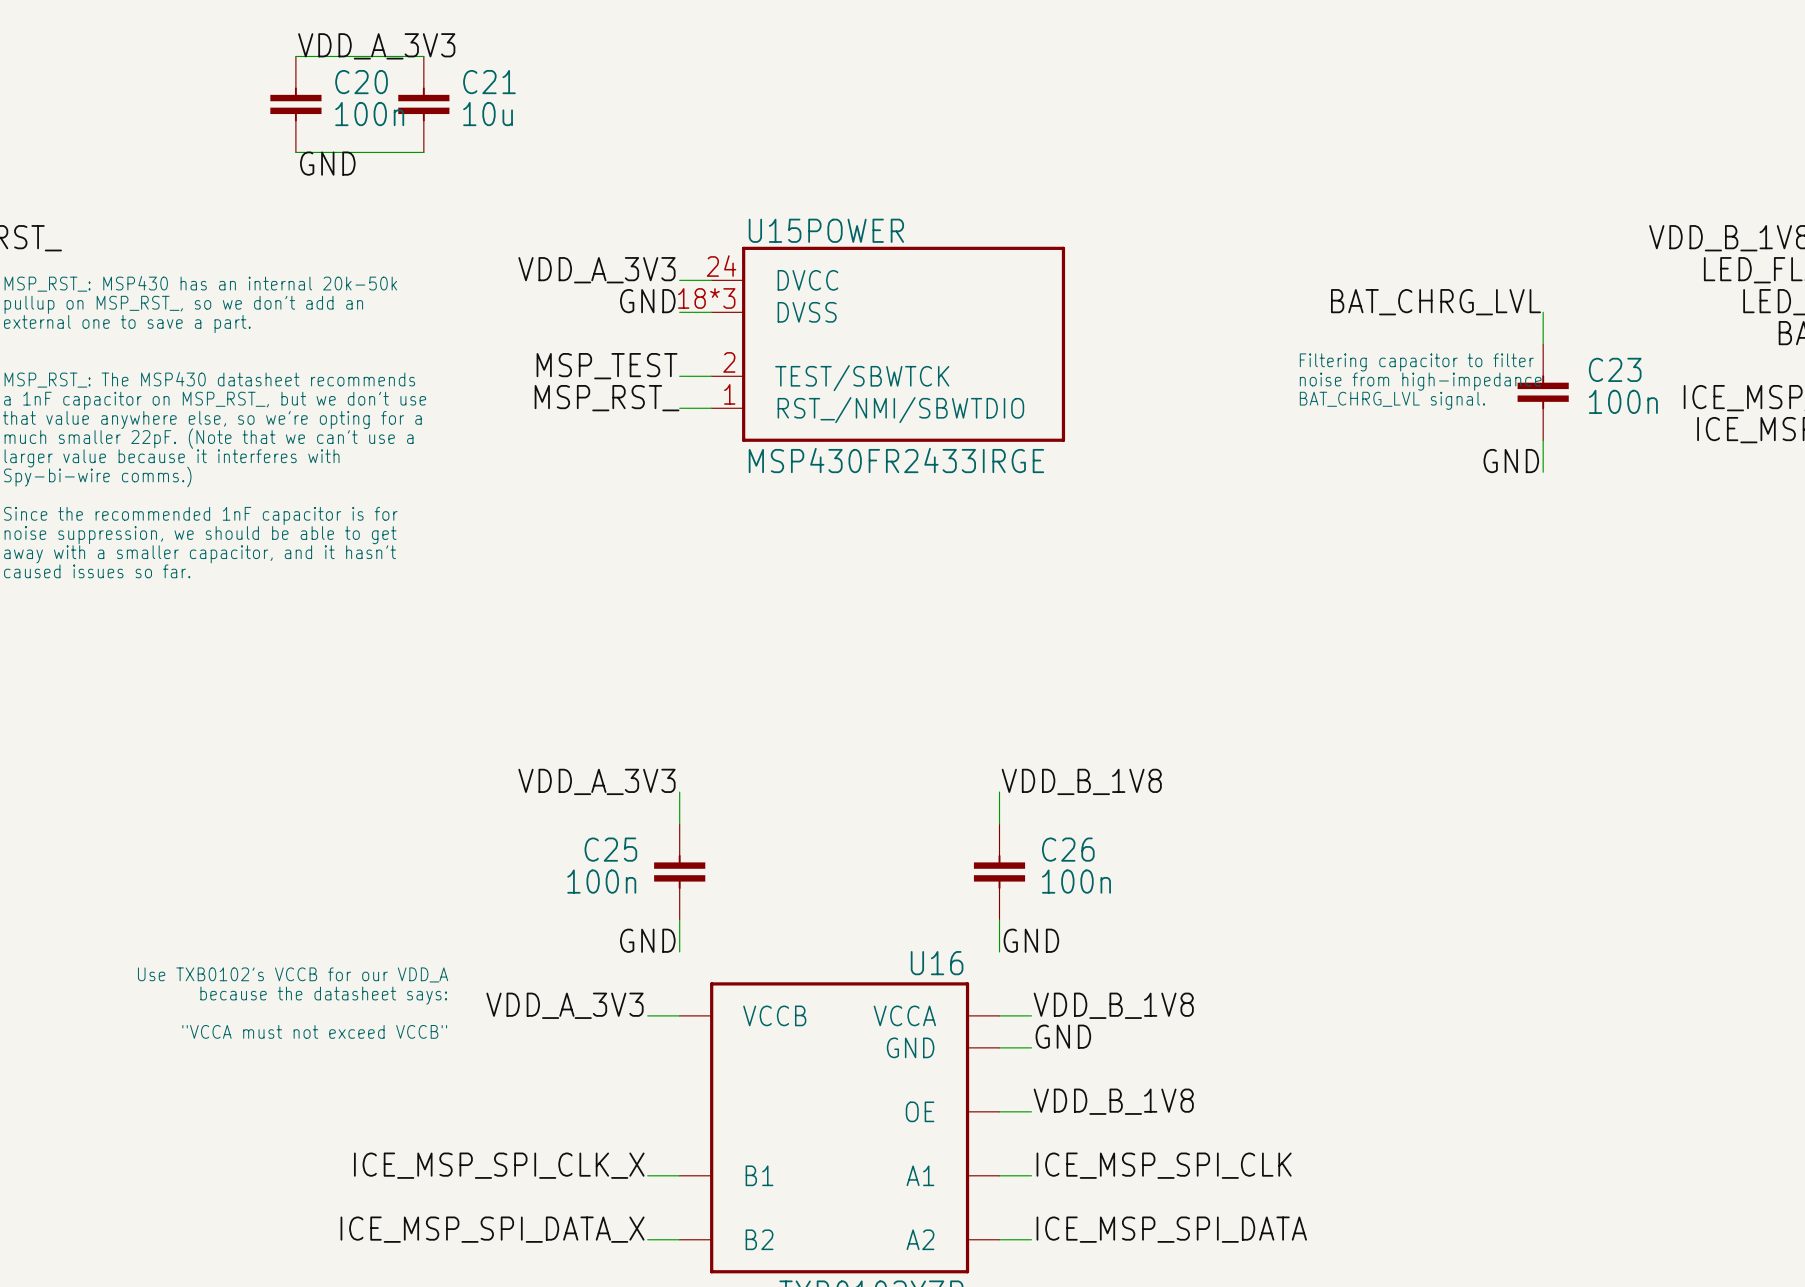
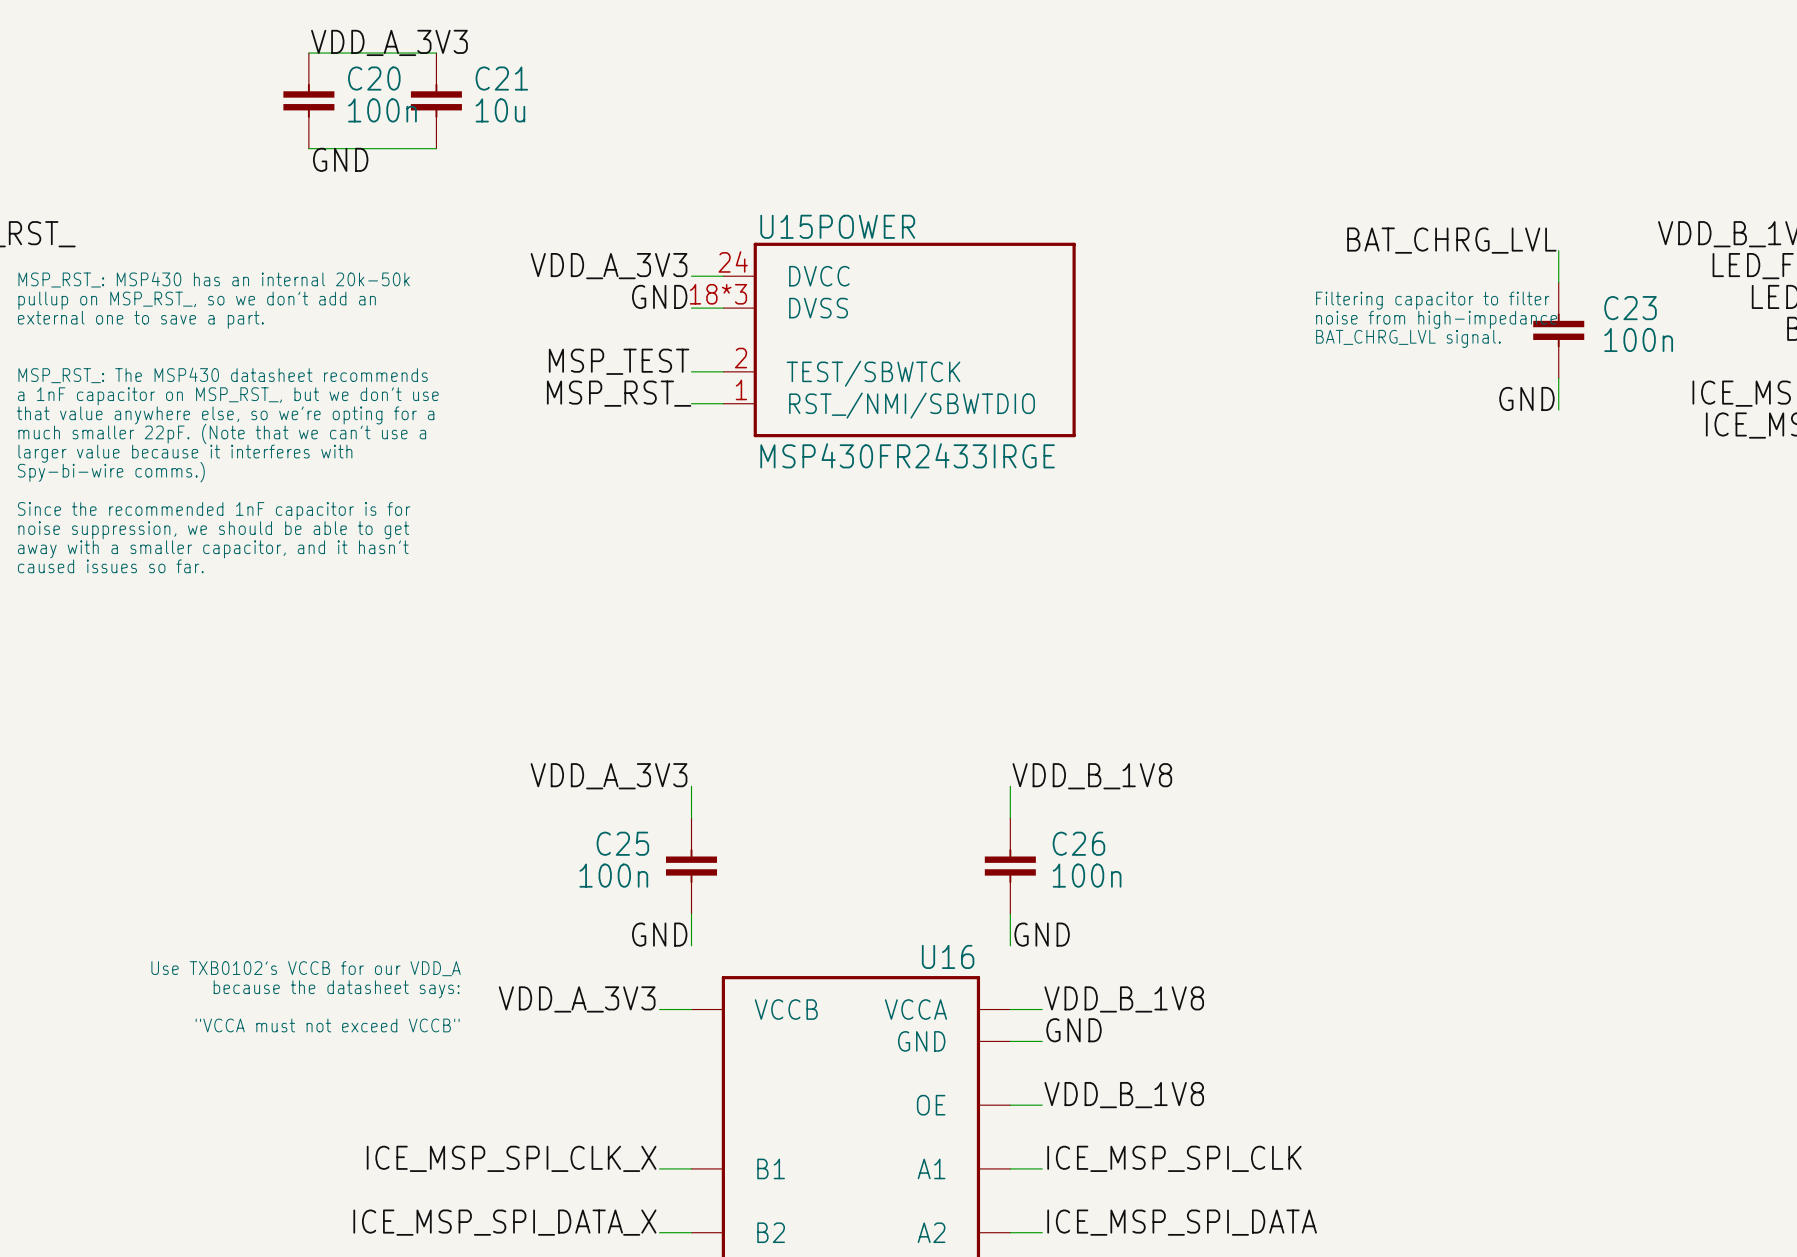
label position: BAT_CHRG_LVL (1435, 302) -> BAT_CHRG_LVL (1451, 240)
wire: (1543, 312) (1543, 344) -> (1558, 250) (1558, 282)
text position: Filtering capacitor to filter (1416, 362) -> Filtering capacitor to filter (1432, 300)
text position: noise from high-impedance (1420, 381) -> noise from high-impedance (1436, 319)
C23 position: (1543, 392) -> (1558, 330)
text position: BAT_CHRG_LVL signal. (1392, 400) -> BAT_CHRG_LVL signal. (1408, 338)
wire: (1543, 440) (1543, 472) -> (1558, 378) (1558, 410)
label position: GND (1511, 461) -> GND (1526, 398)

